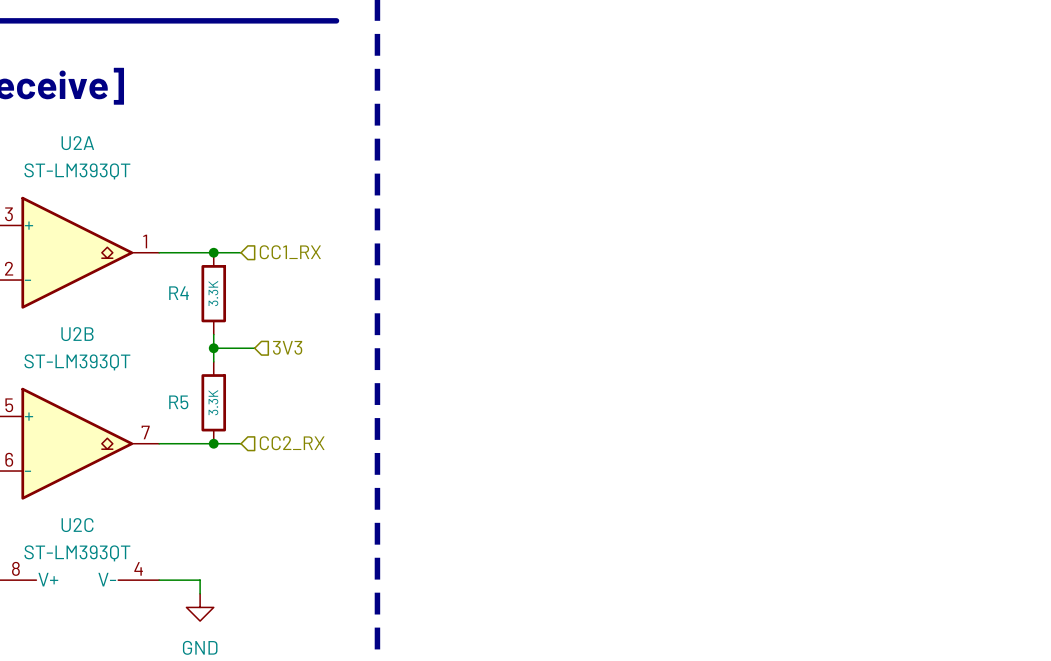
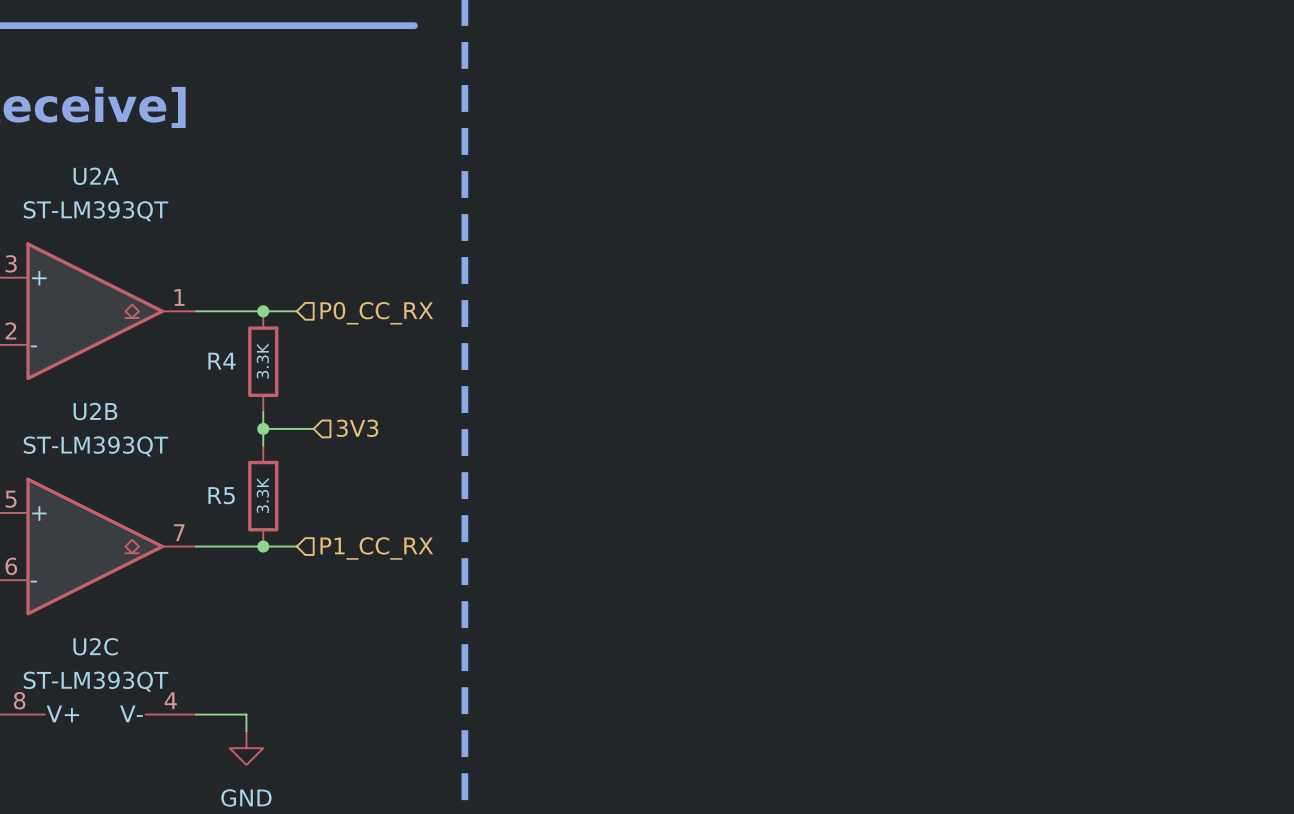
hierarchical label: CC1_RX (290, 252) -> P0_CC_RX (376, 313)
hierarchical label: CC2_RX (292, 443) -> P1_CC_RX (376, 548)

